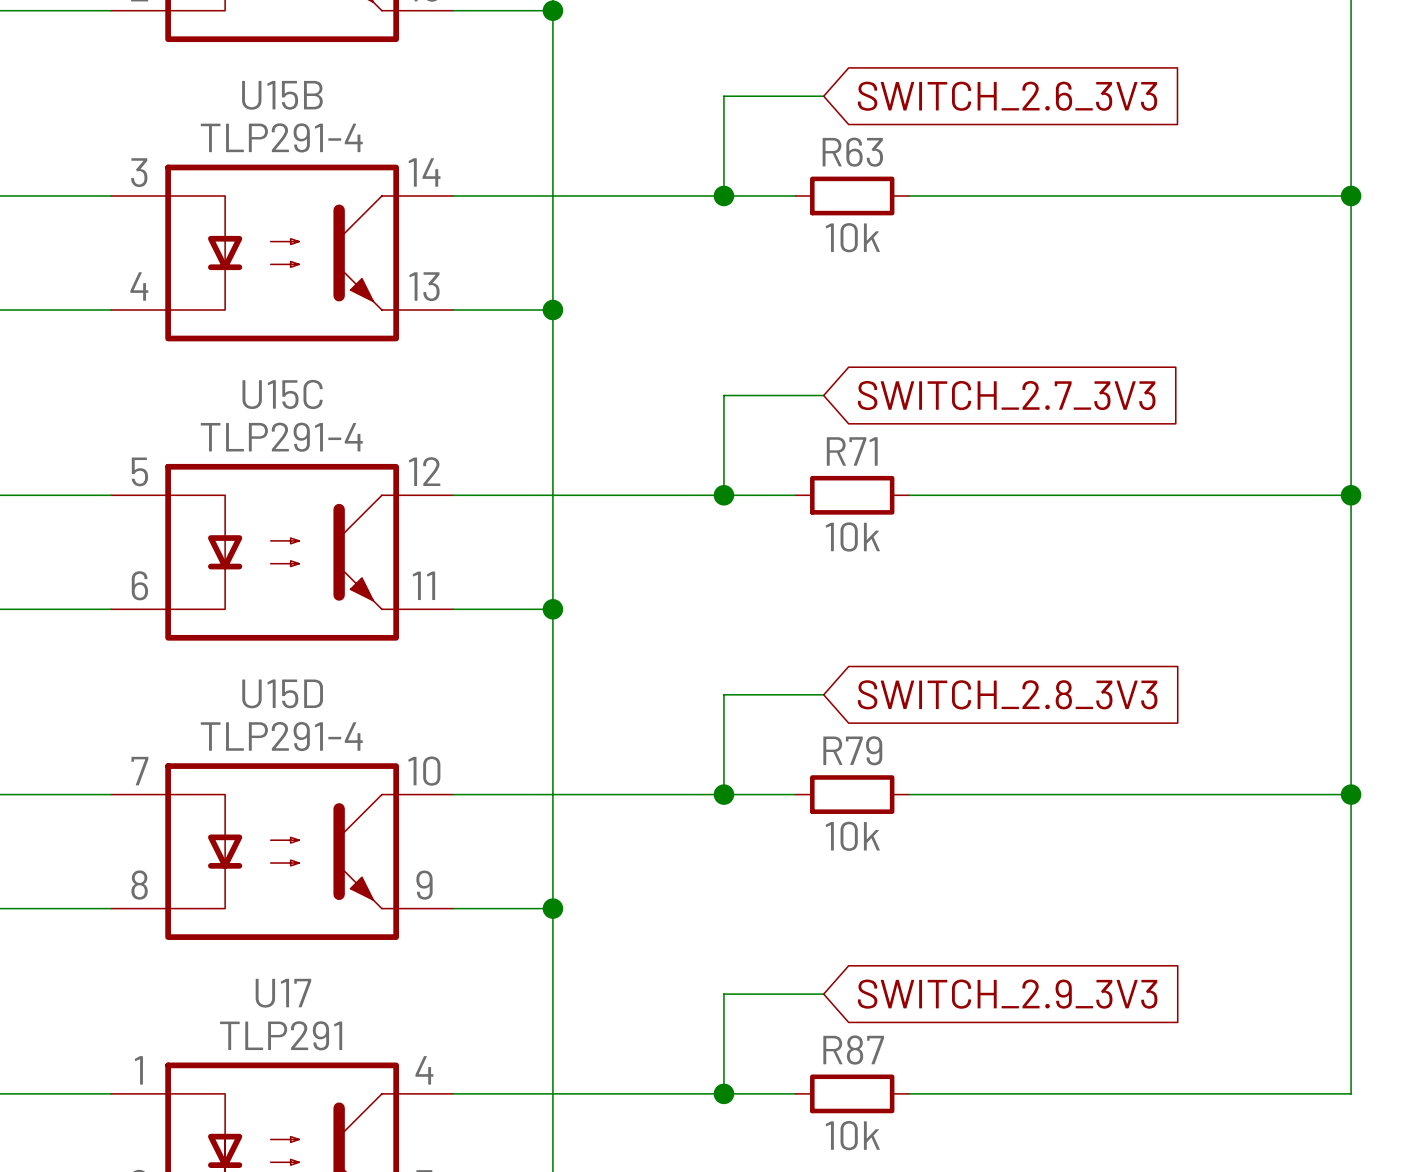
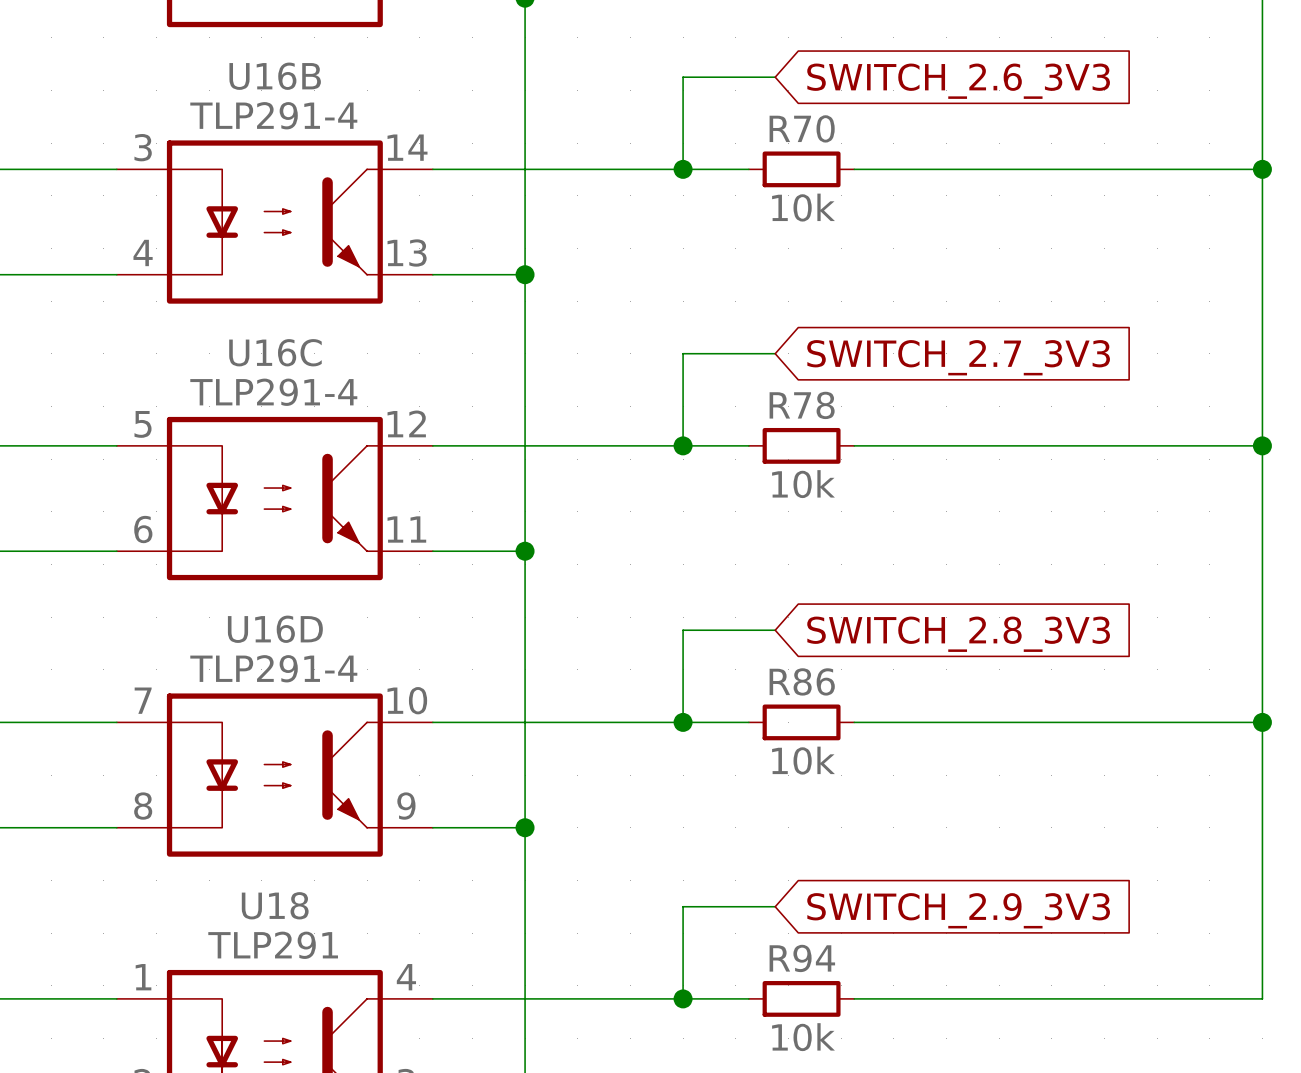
U15B name: U15B (282, 95) -> U16B (275, 76)
R63 name: R63 (852, 152) -> R70 (802, 128)
U15C name: U15C (282, 394) -> U16C (275, 352)
R71 name: R71 (852, 451) -> R78 (802, 405)
U15D name: U15D (282, 693) -> U16D (275, 629)
R79 name: R79 (852, 750) -> R86 (802, 681)
U17 name: U17 (283, 993) -> U18 (275, 905)
R87 name: R87 (853, 1050) -> R94 (802, 958)

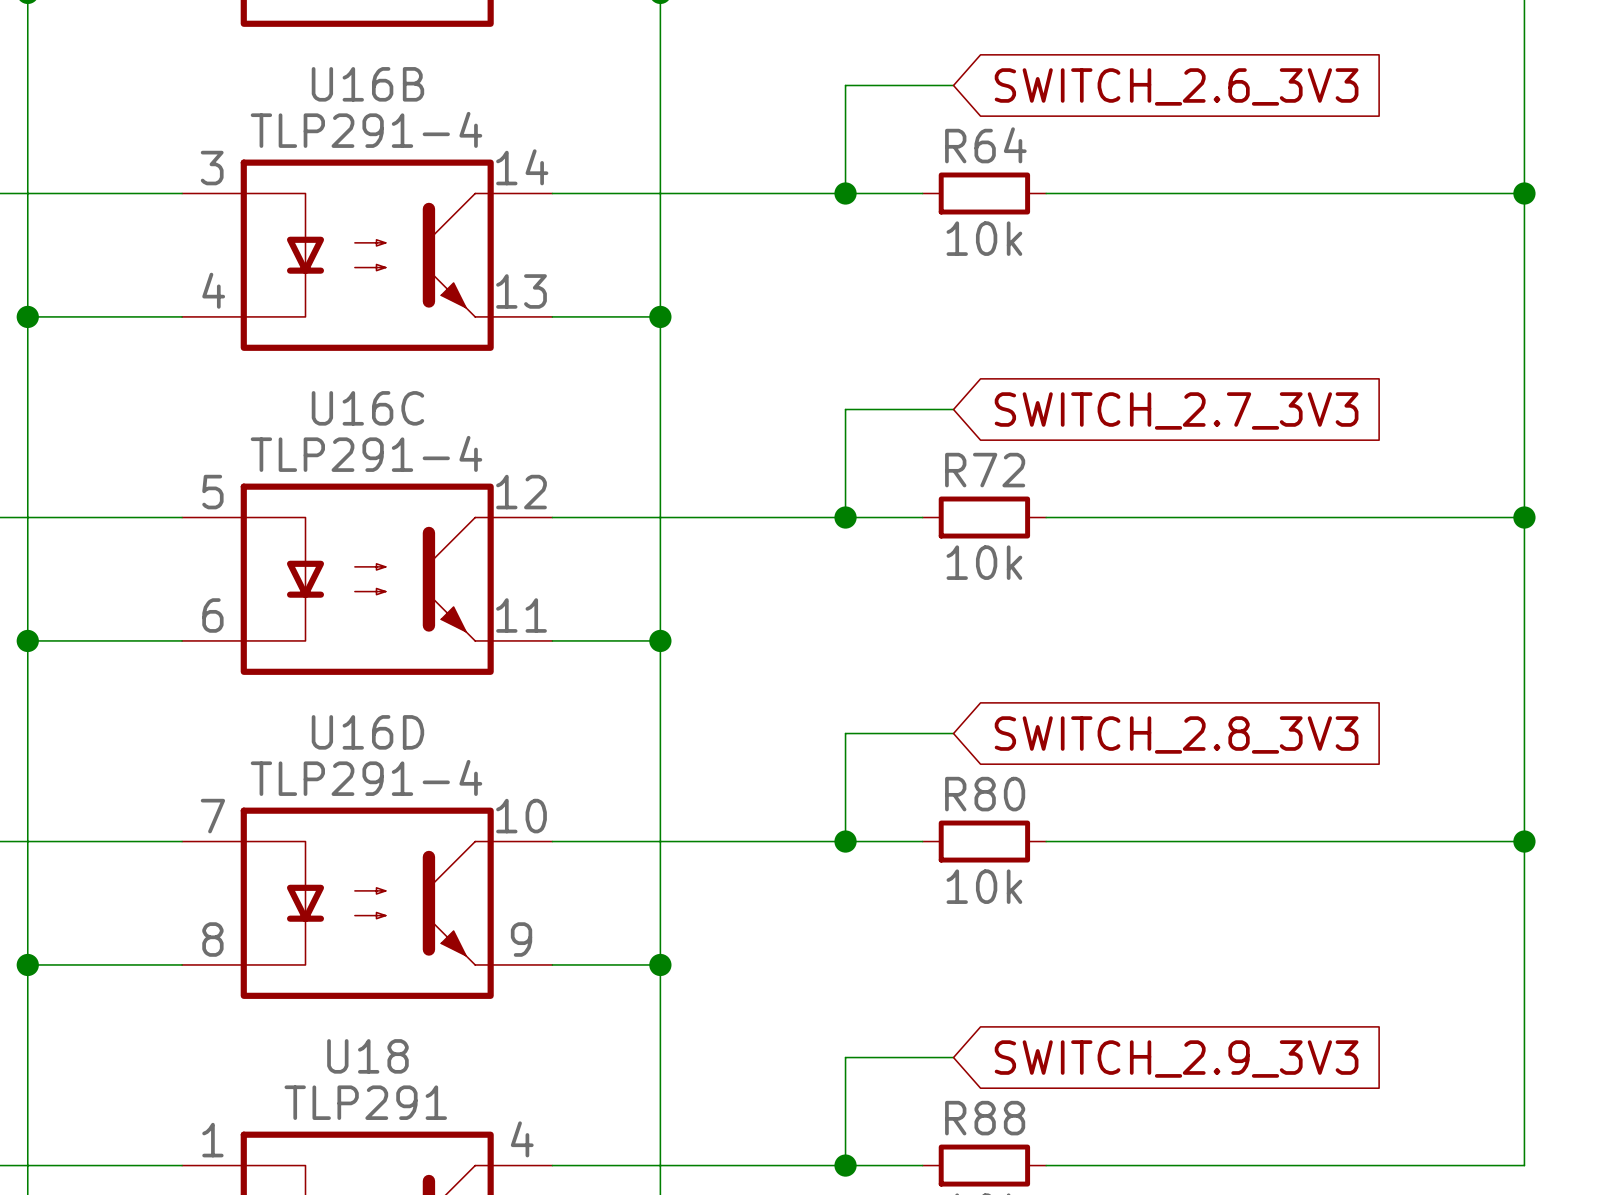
R70 name: R70 (802, 128) -> R64 (985, 145)
R78 name: R78 (802, 405) -> R72 (985, 470)
R86 name: R86 (802, 681) -> R80 (985, 794)
R94 name: R94 (802, 958) -> R88 (985, 1118)

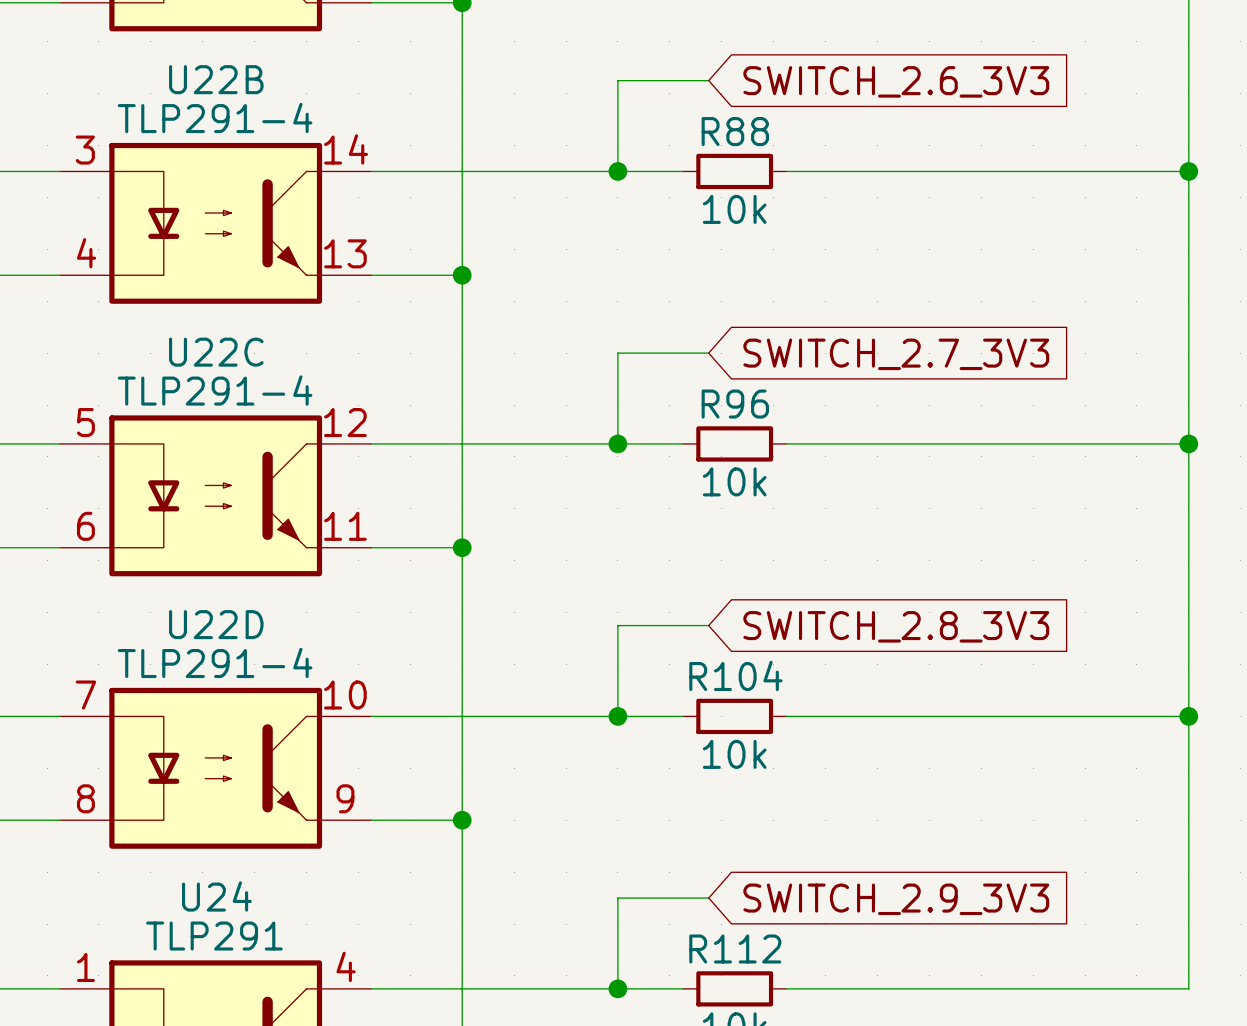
U16B name: U16B (367, 84) -> U22B (216, 79)
R64 name: R64 (985, 145) -> R88 (735, 131)
U16C name: U16C (367, 408) -> U22C (216, 352)
R72 name: R72 (985, 470) -> R96 (735, 404)
U16D name: U16D (367, 732) -> U22D (216, 624)
R80 name: R80 (985, 794) -> R104 (735, 675)
U18 name: U18 (367, 1056) -> U24 (216, 896)
R88 name: R88 (985, 1118) -> R112 (735, 948)

